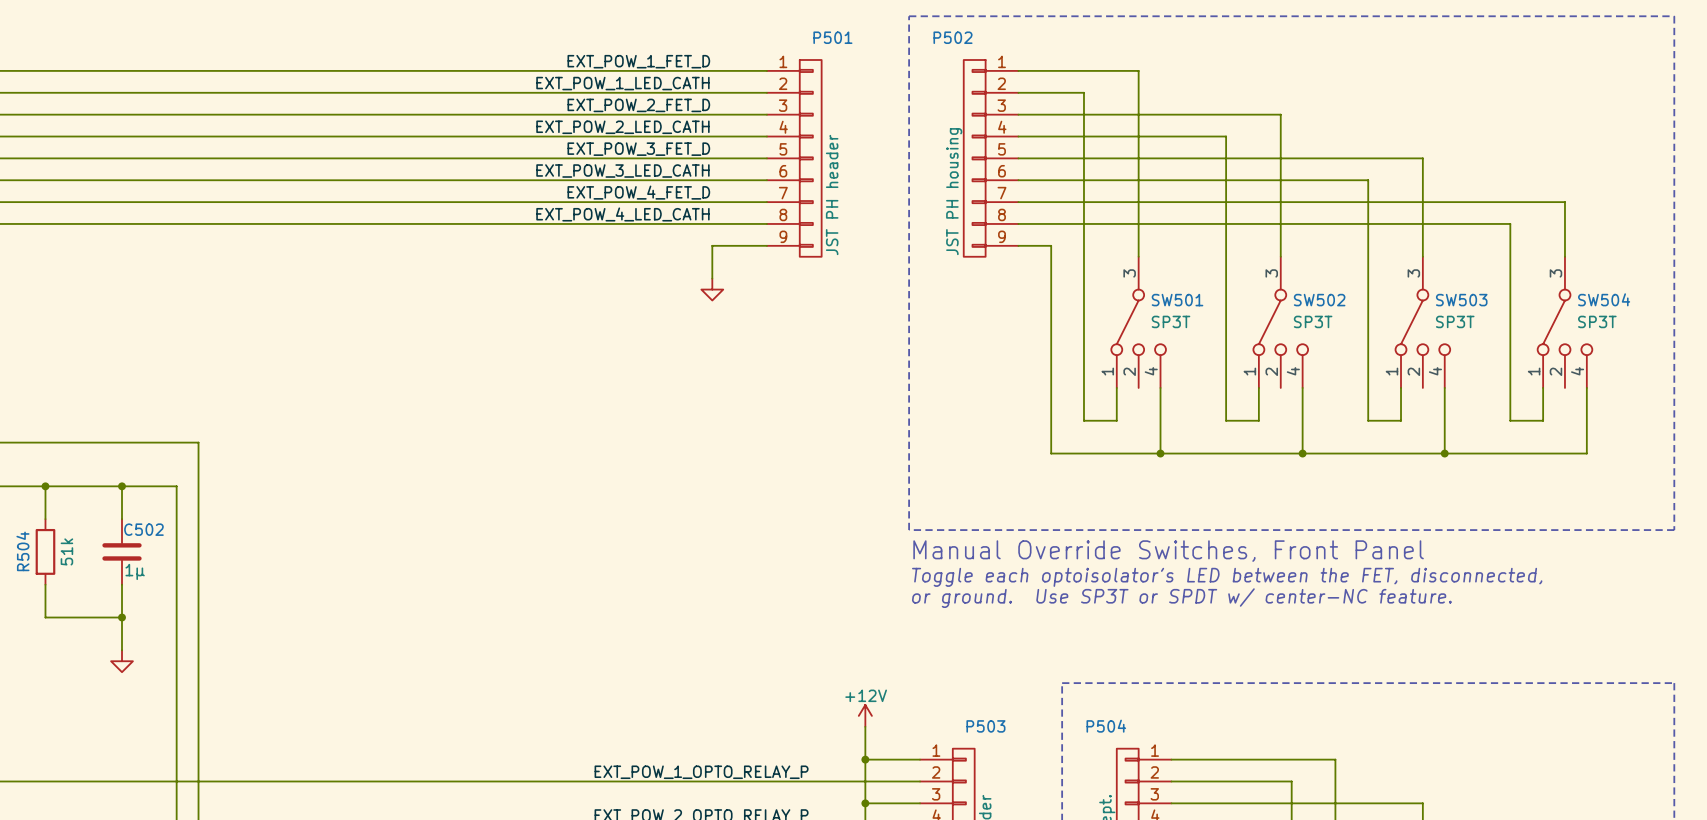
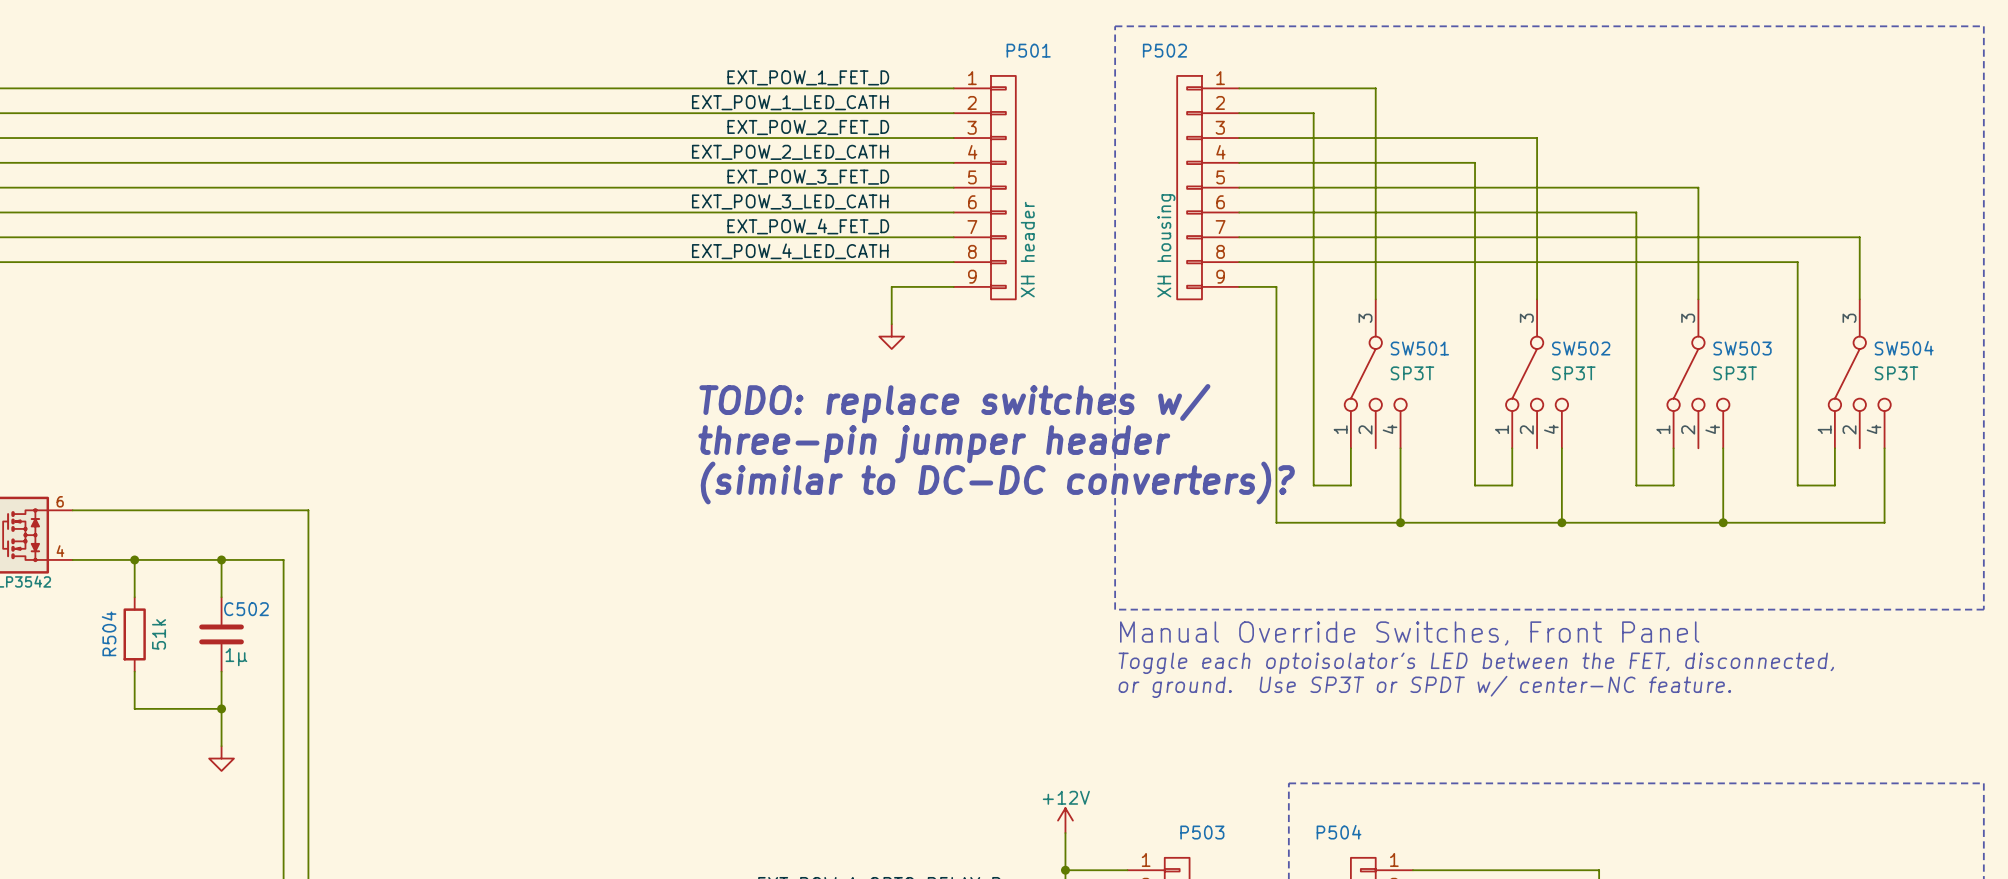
P502 value: JST PH housing (954, 191) -> XH housing (1166, 245)
P501 value: JST PH header (832, 195) -> XH header (1027, 249)
text: none -> TODO: replace switches w/ (954, 403)
text: none -> three-pin jumper header (934, 444)
text: none -> (similar to DC-DC converters)? (997, 482)

